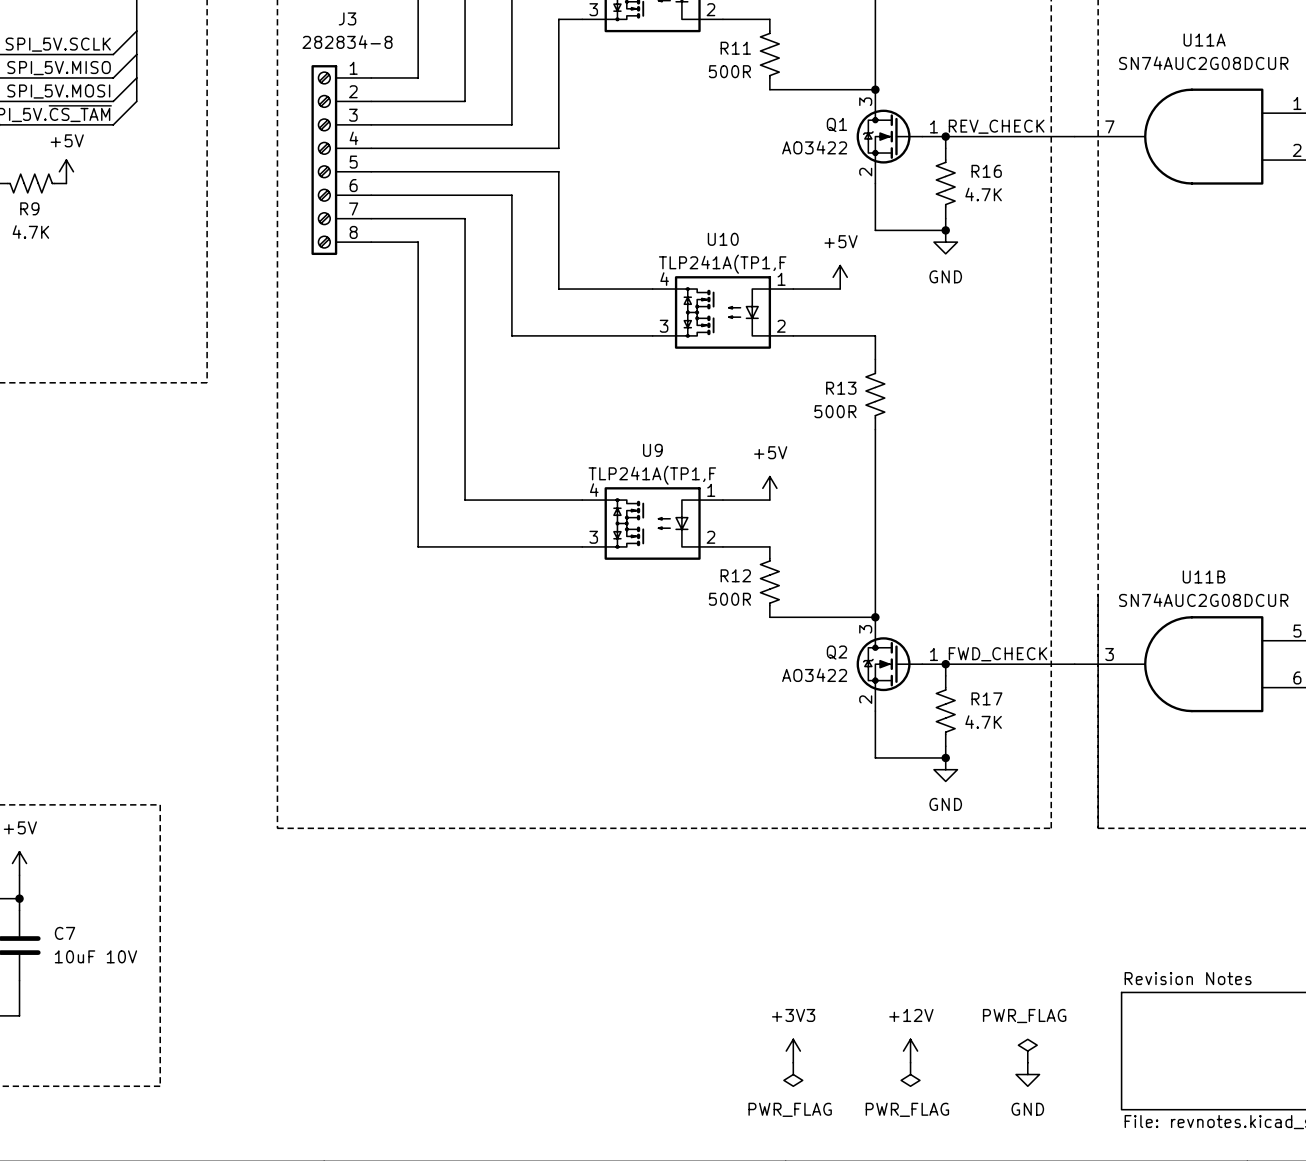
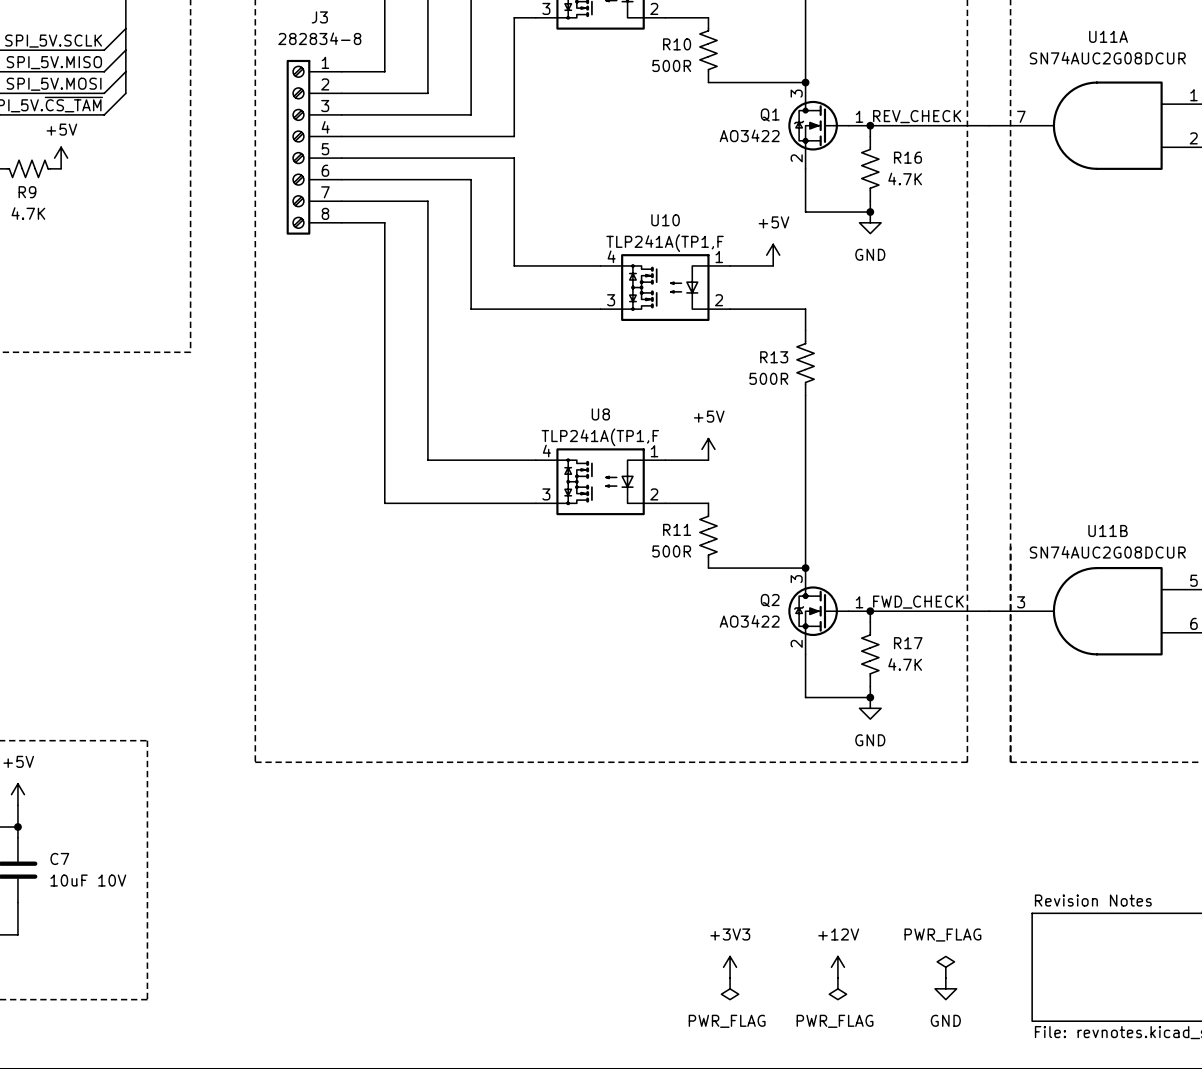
R11 name: R11 (735, 48) -> R10 (677, 44)
U9 name: U9 (652, 450) -> U8 (600, 414)
R12 name: R12 (735, 575) -> R11 (677, 529)

